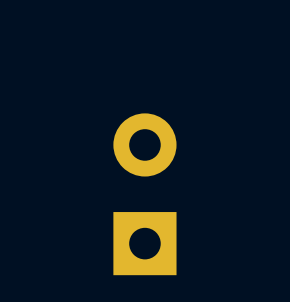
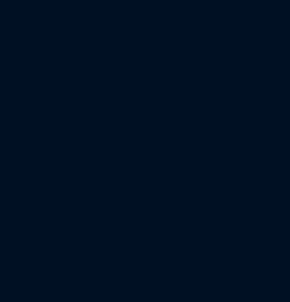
part: (144, 194) -> none

